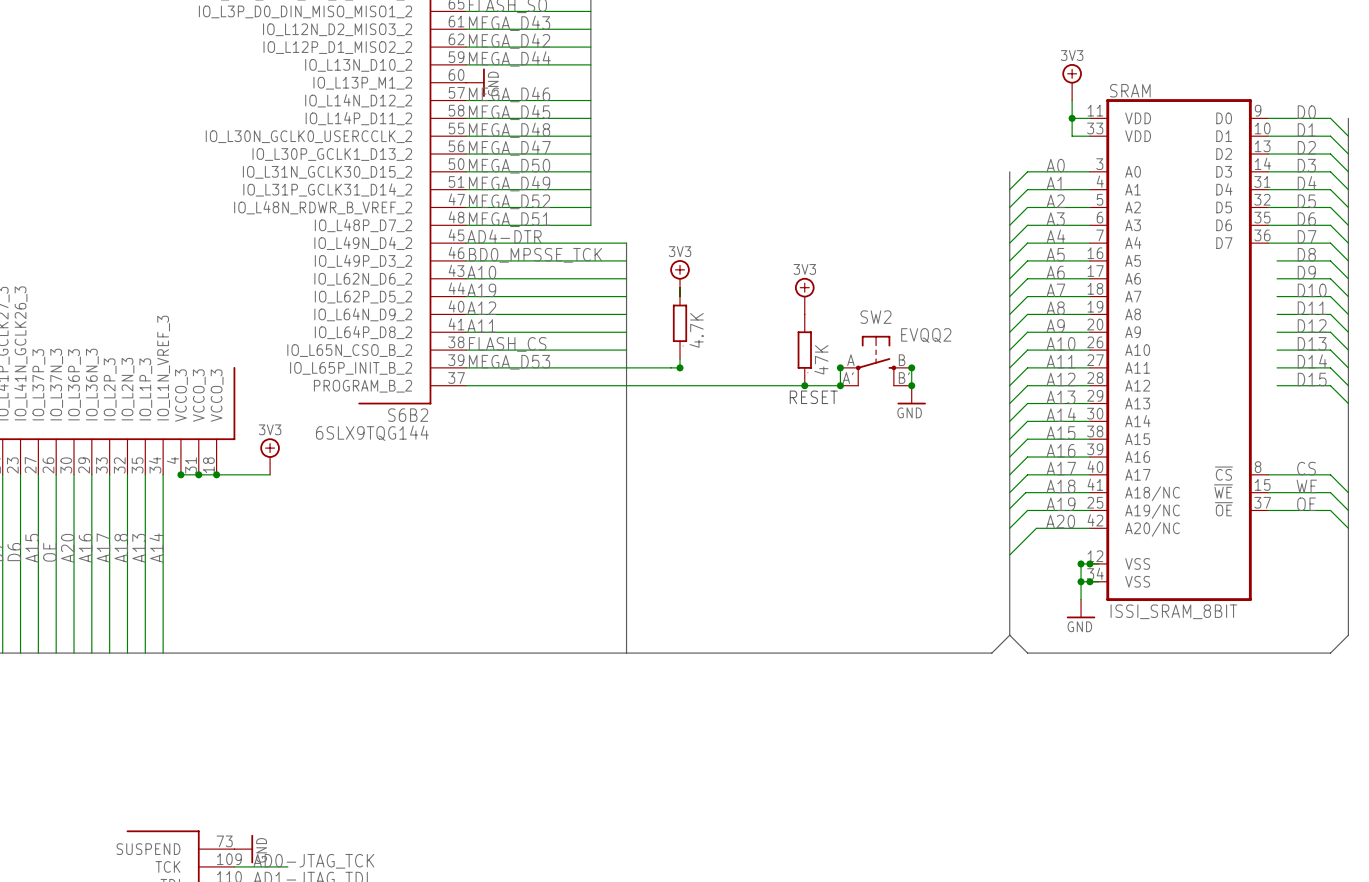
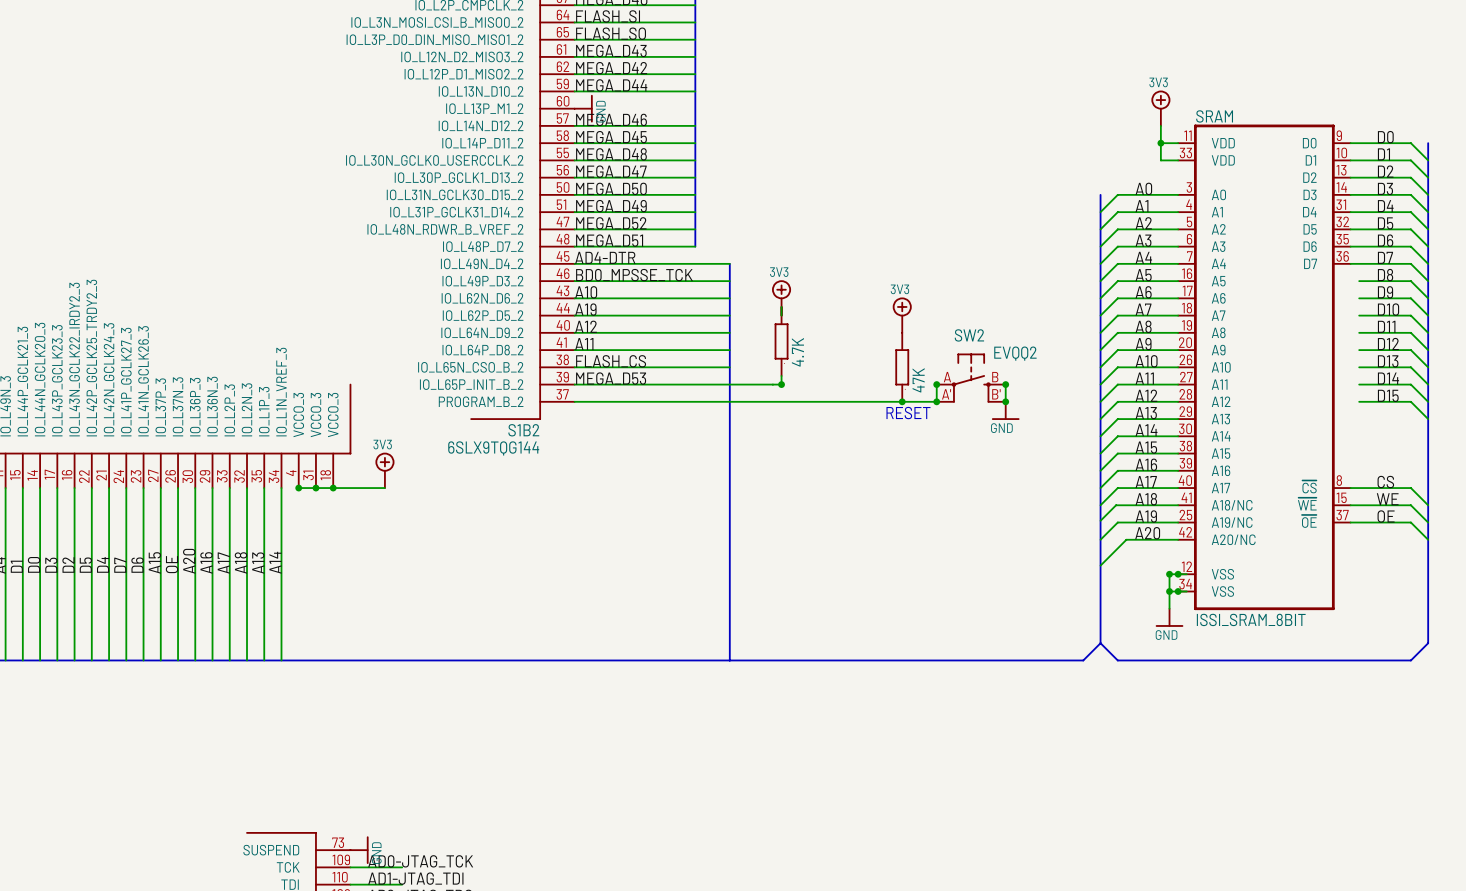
S6B2 name: S6B2 (408, 415) -> S1B2 (523, 430)

